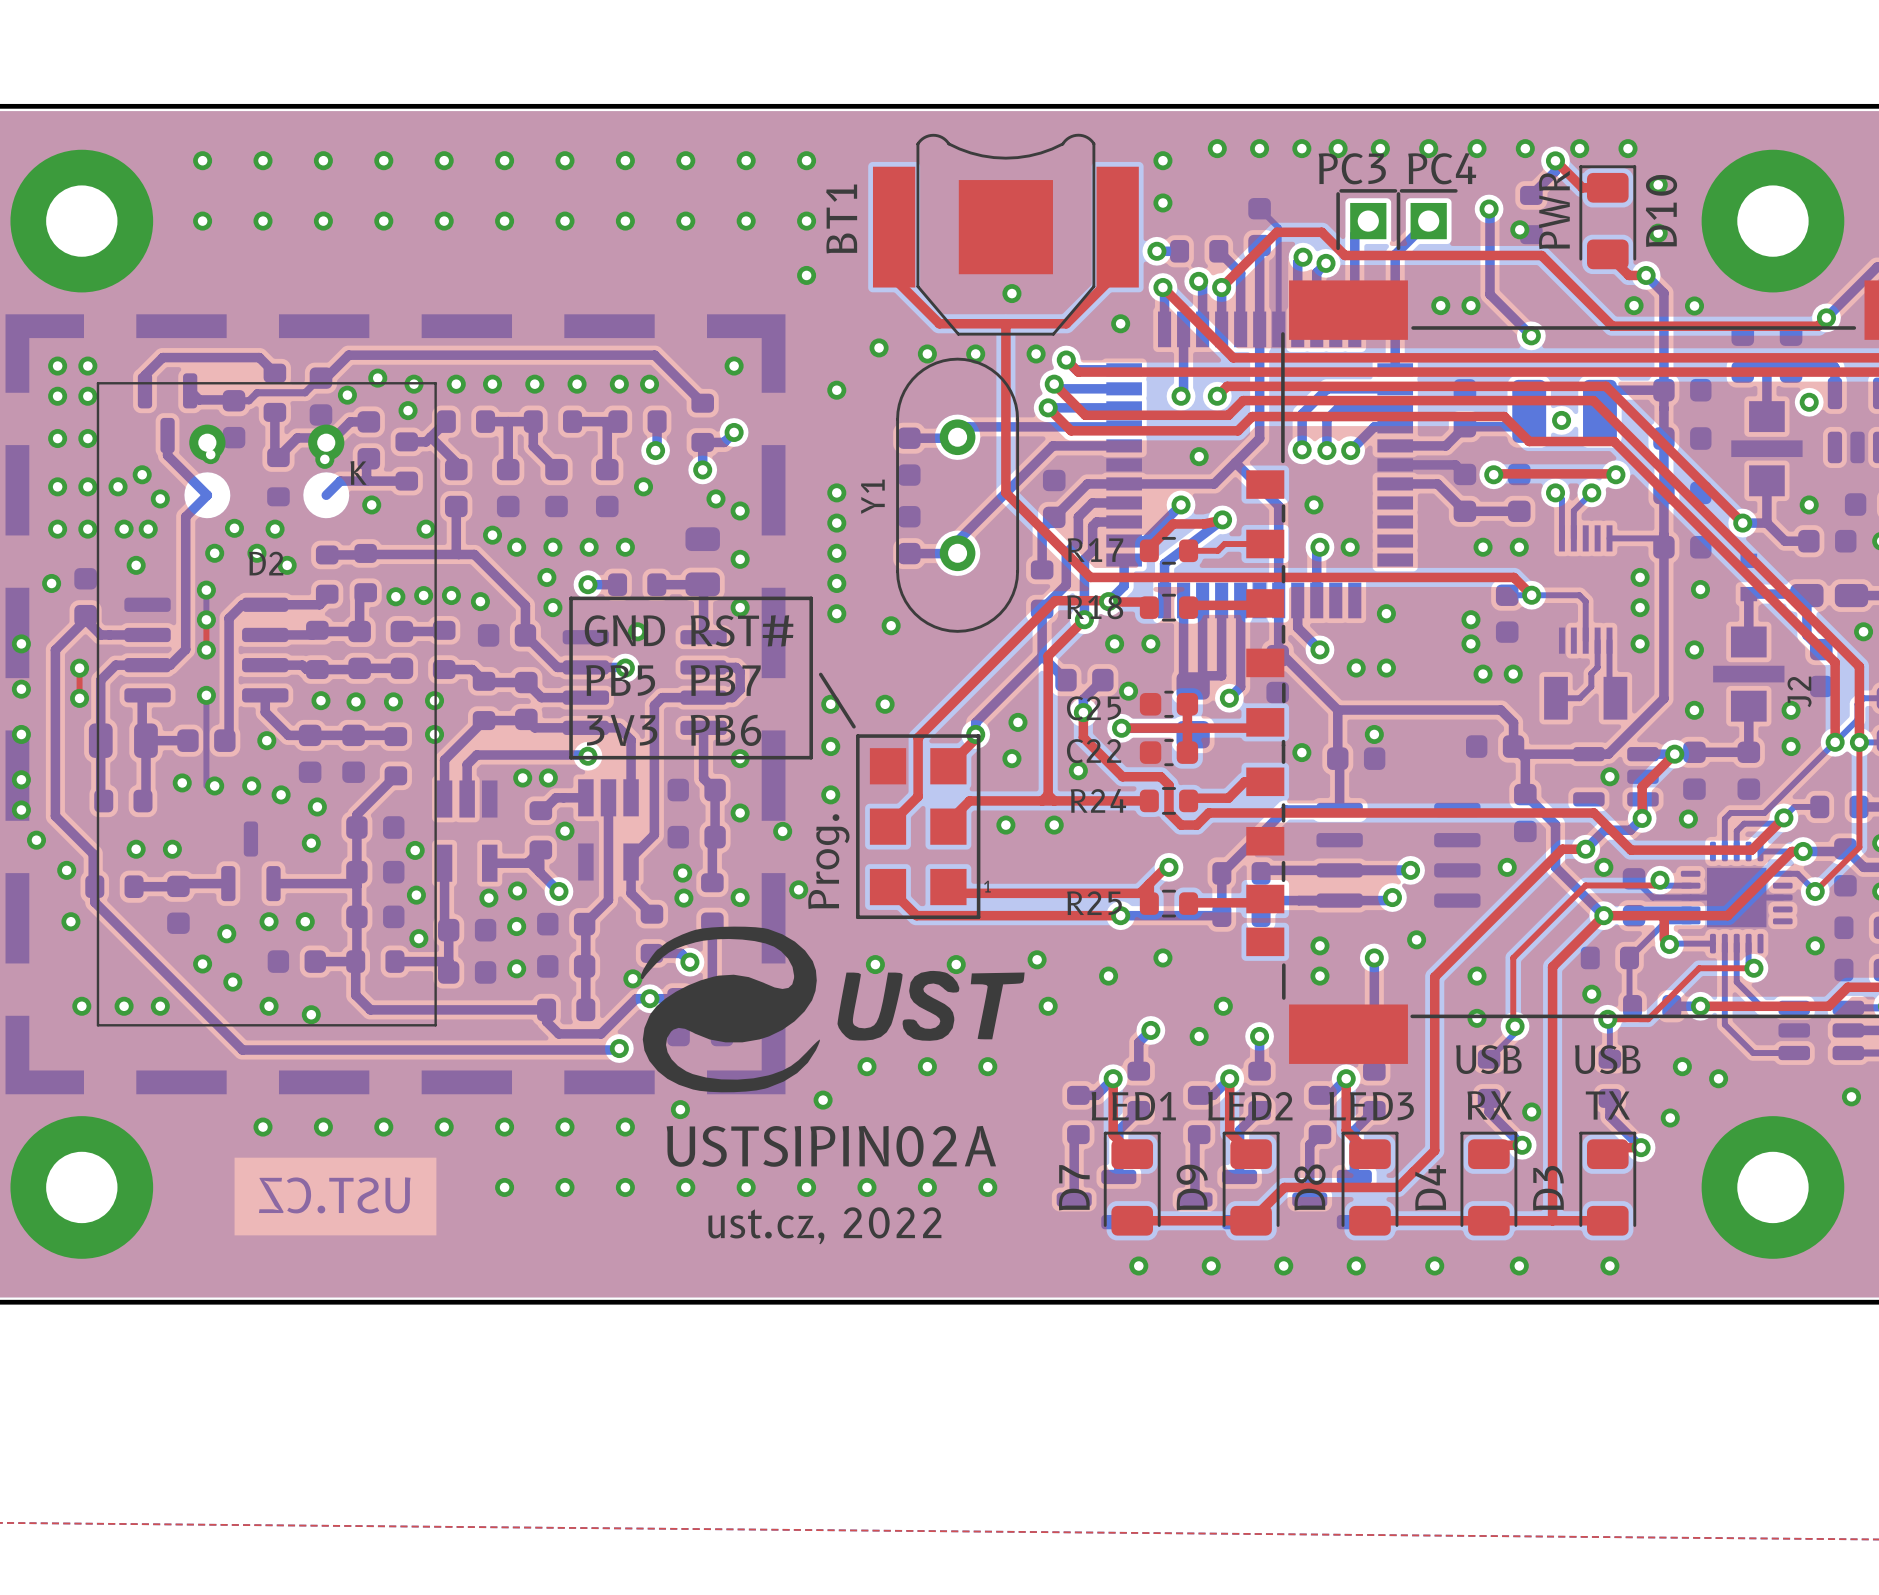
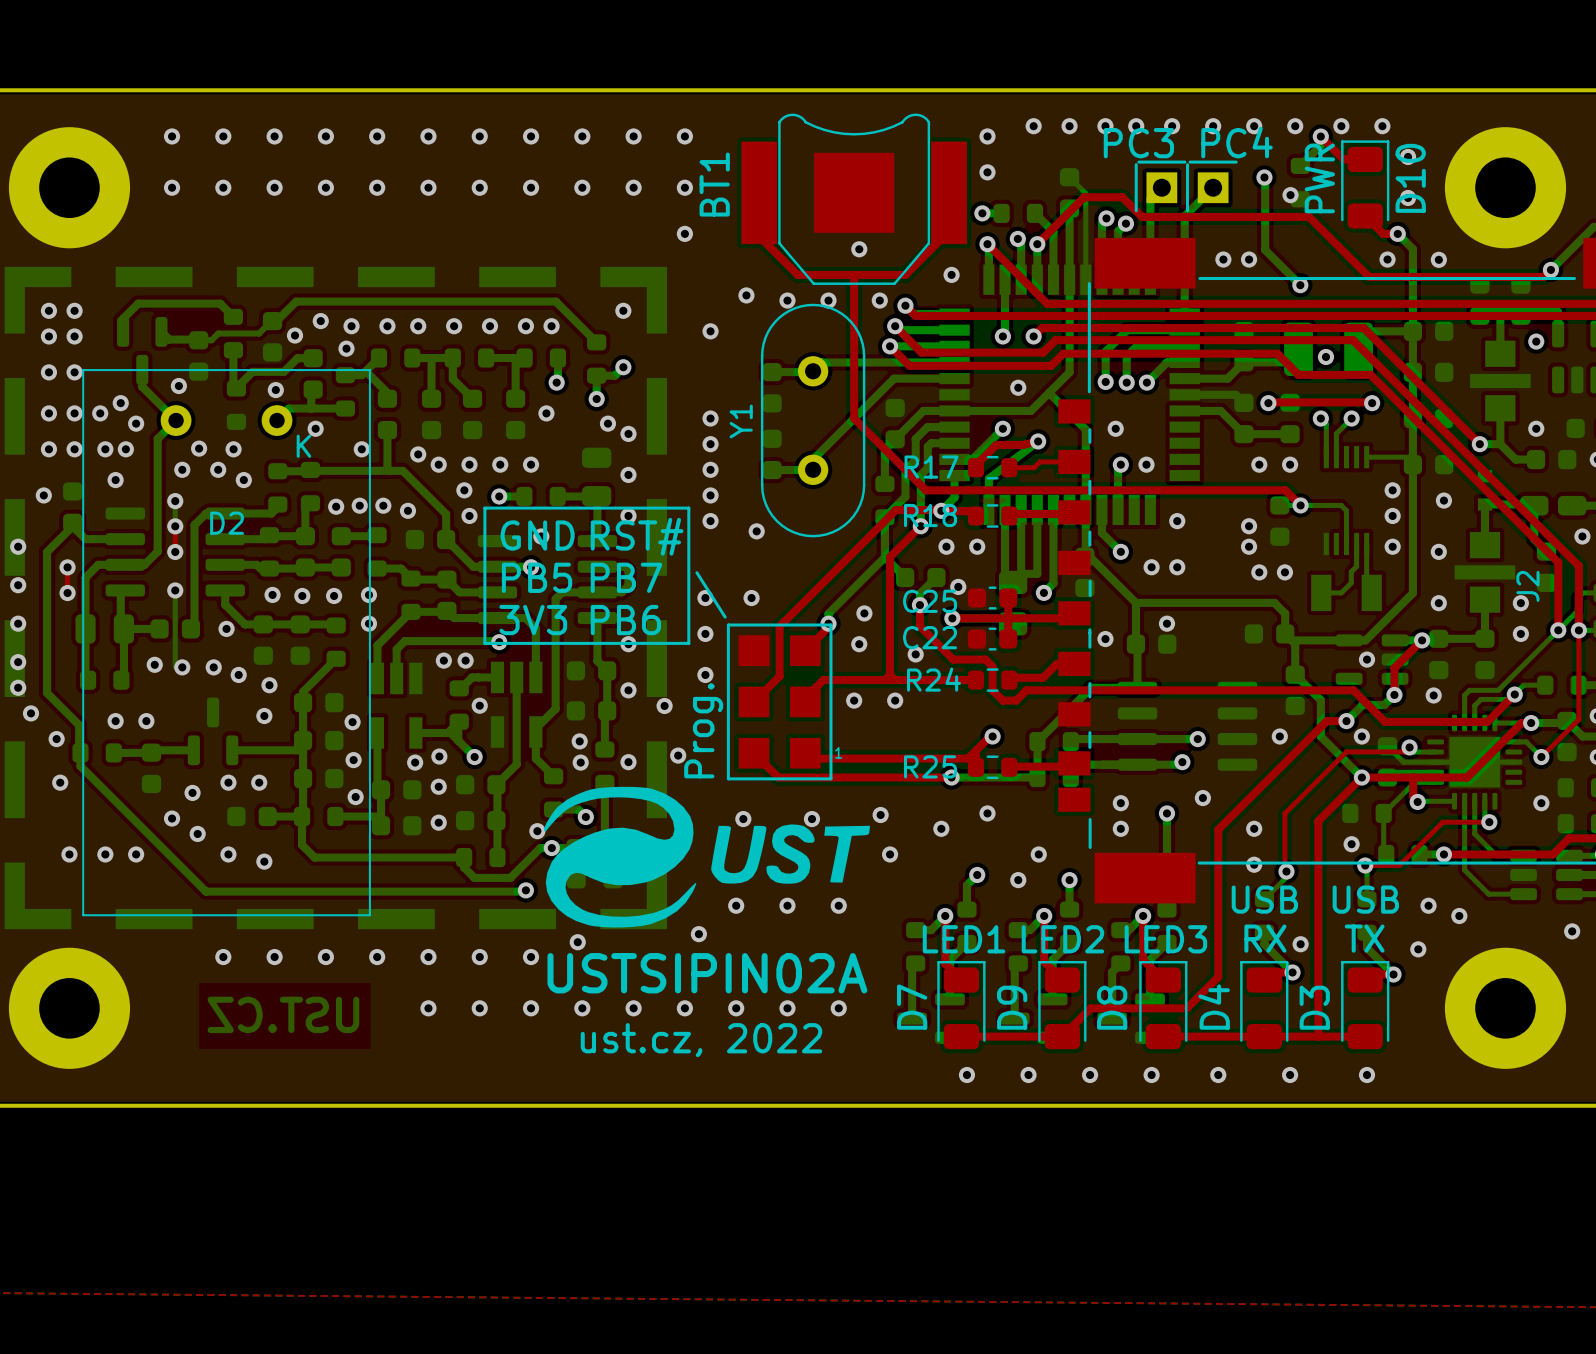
D2 position: (266, 704) -> (226, 642)

